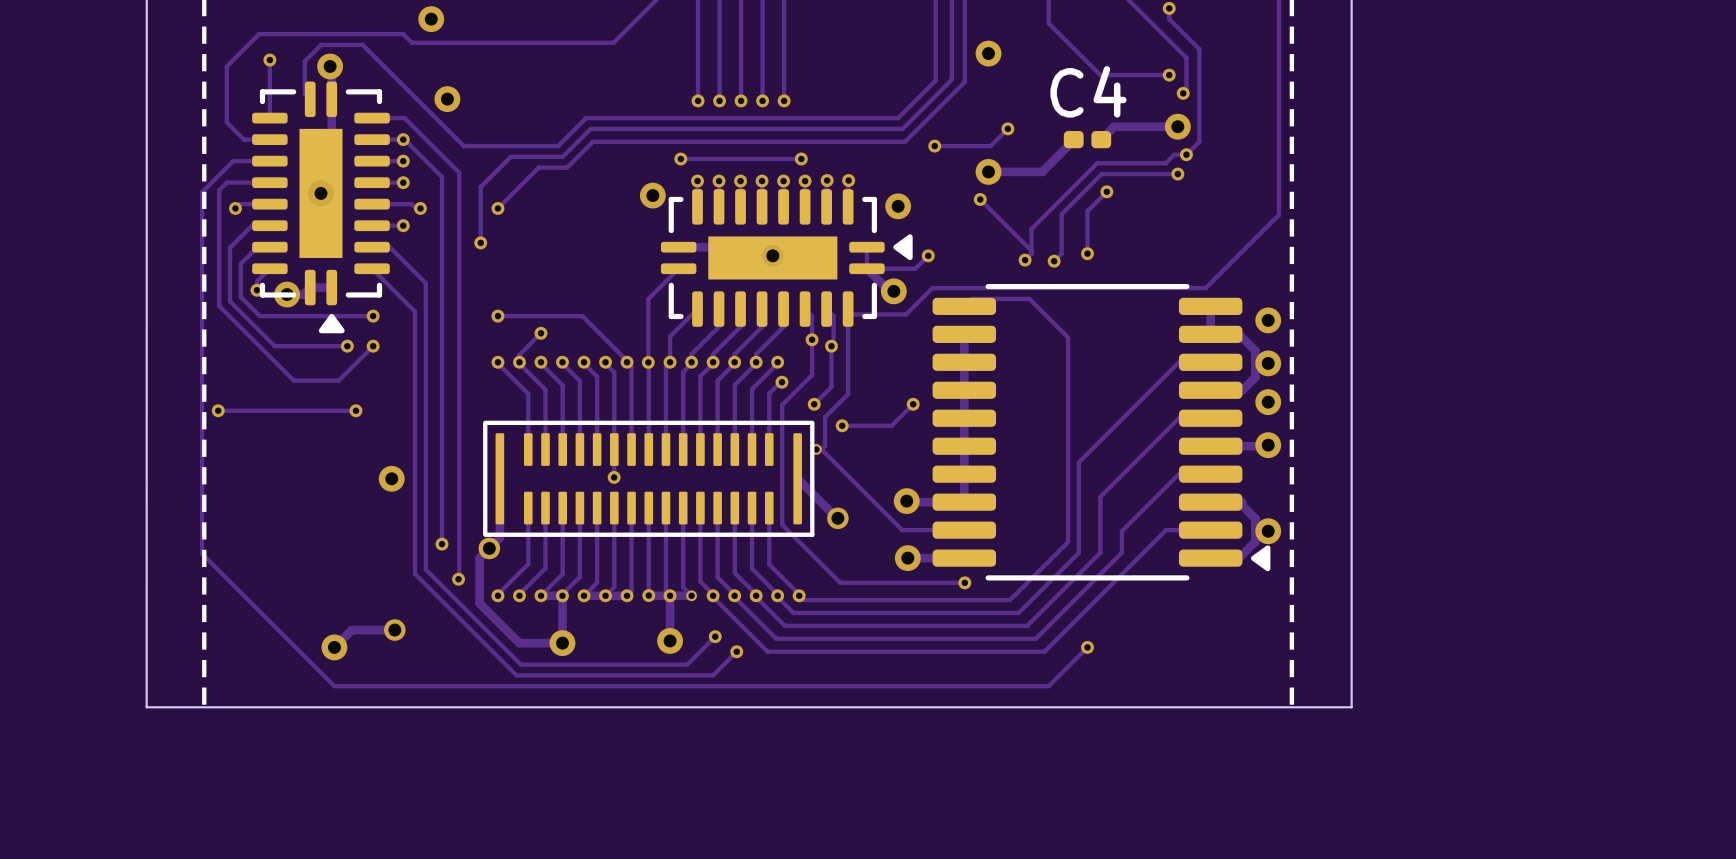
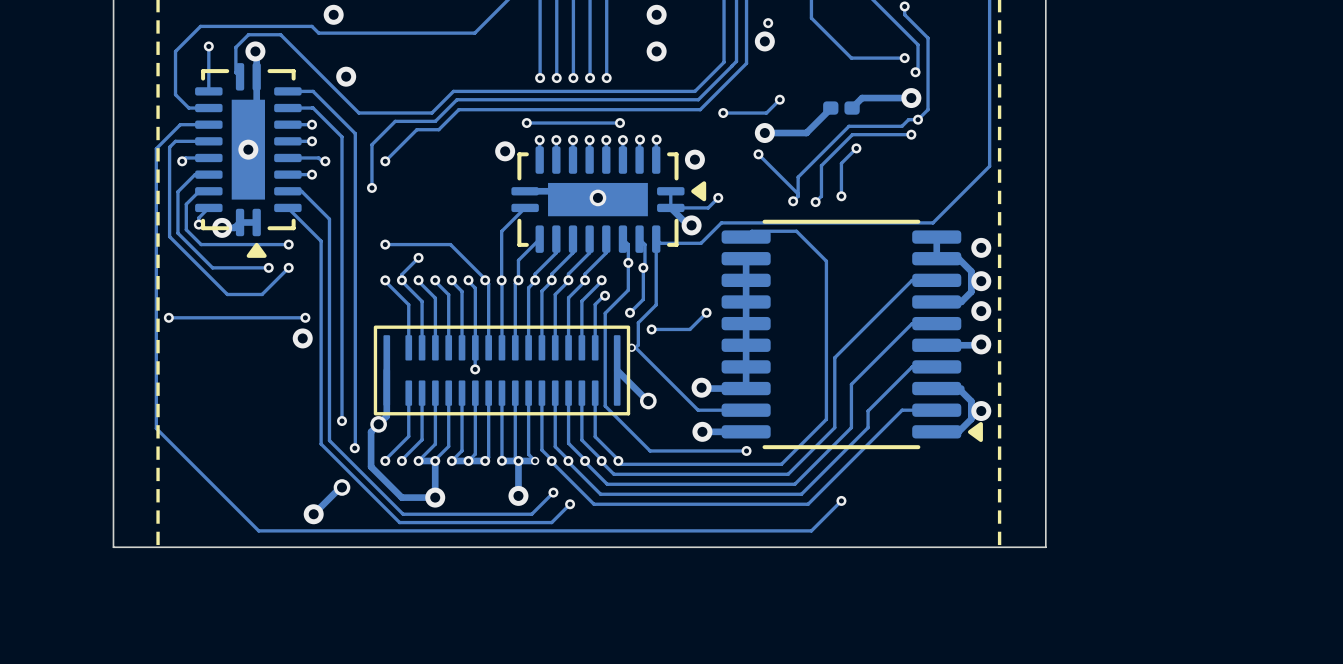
via: none -> (656, 14)
via: none -> (768, 23)
via: none -> (656, 51)
C4 name: C4 (1088, 91) -> none
via: (403, 139) -> none
via position: (355, 410) -> (305, 317)
track: none -> (305, 317) (275, 317)
via position: (391, 478) -> (302, 338)
track: (394, 630) (351, 630) (334, 647) -> none
via position: (394, 630) -> (342, 487)
track: none -> (342, 487) (313, 514)
via position: (334, 647) -> (313, 514)

